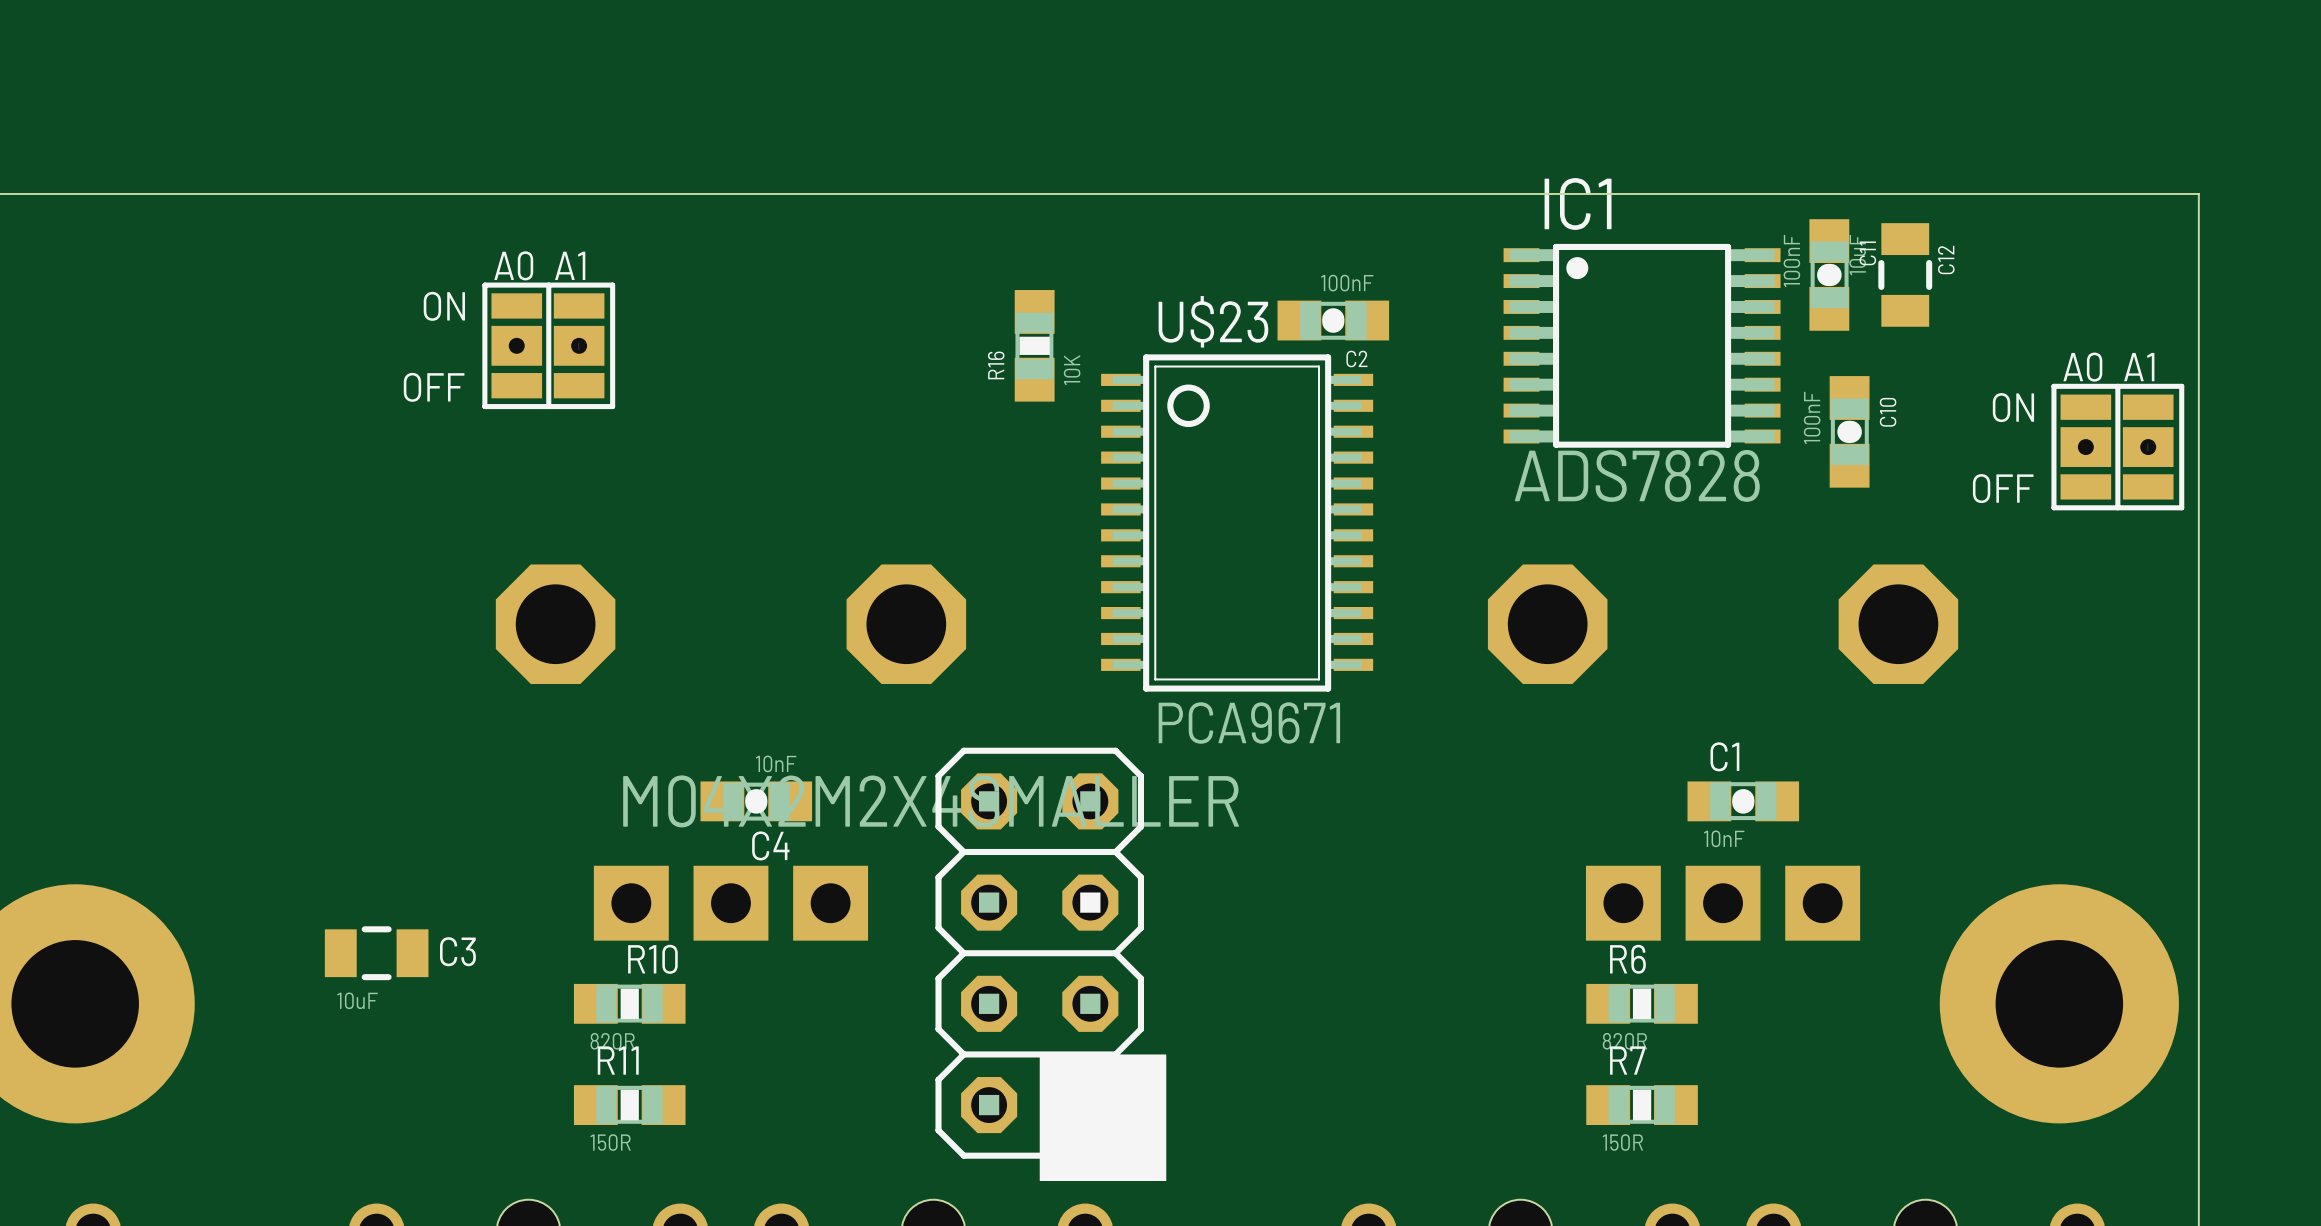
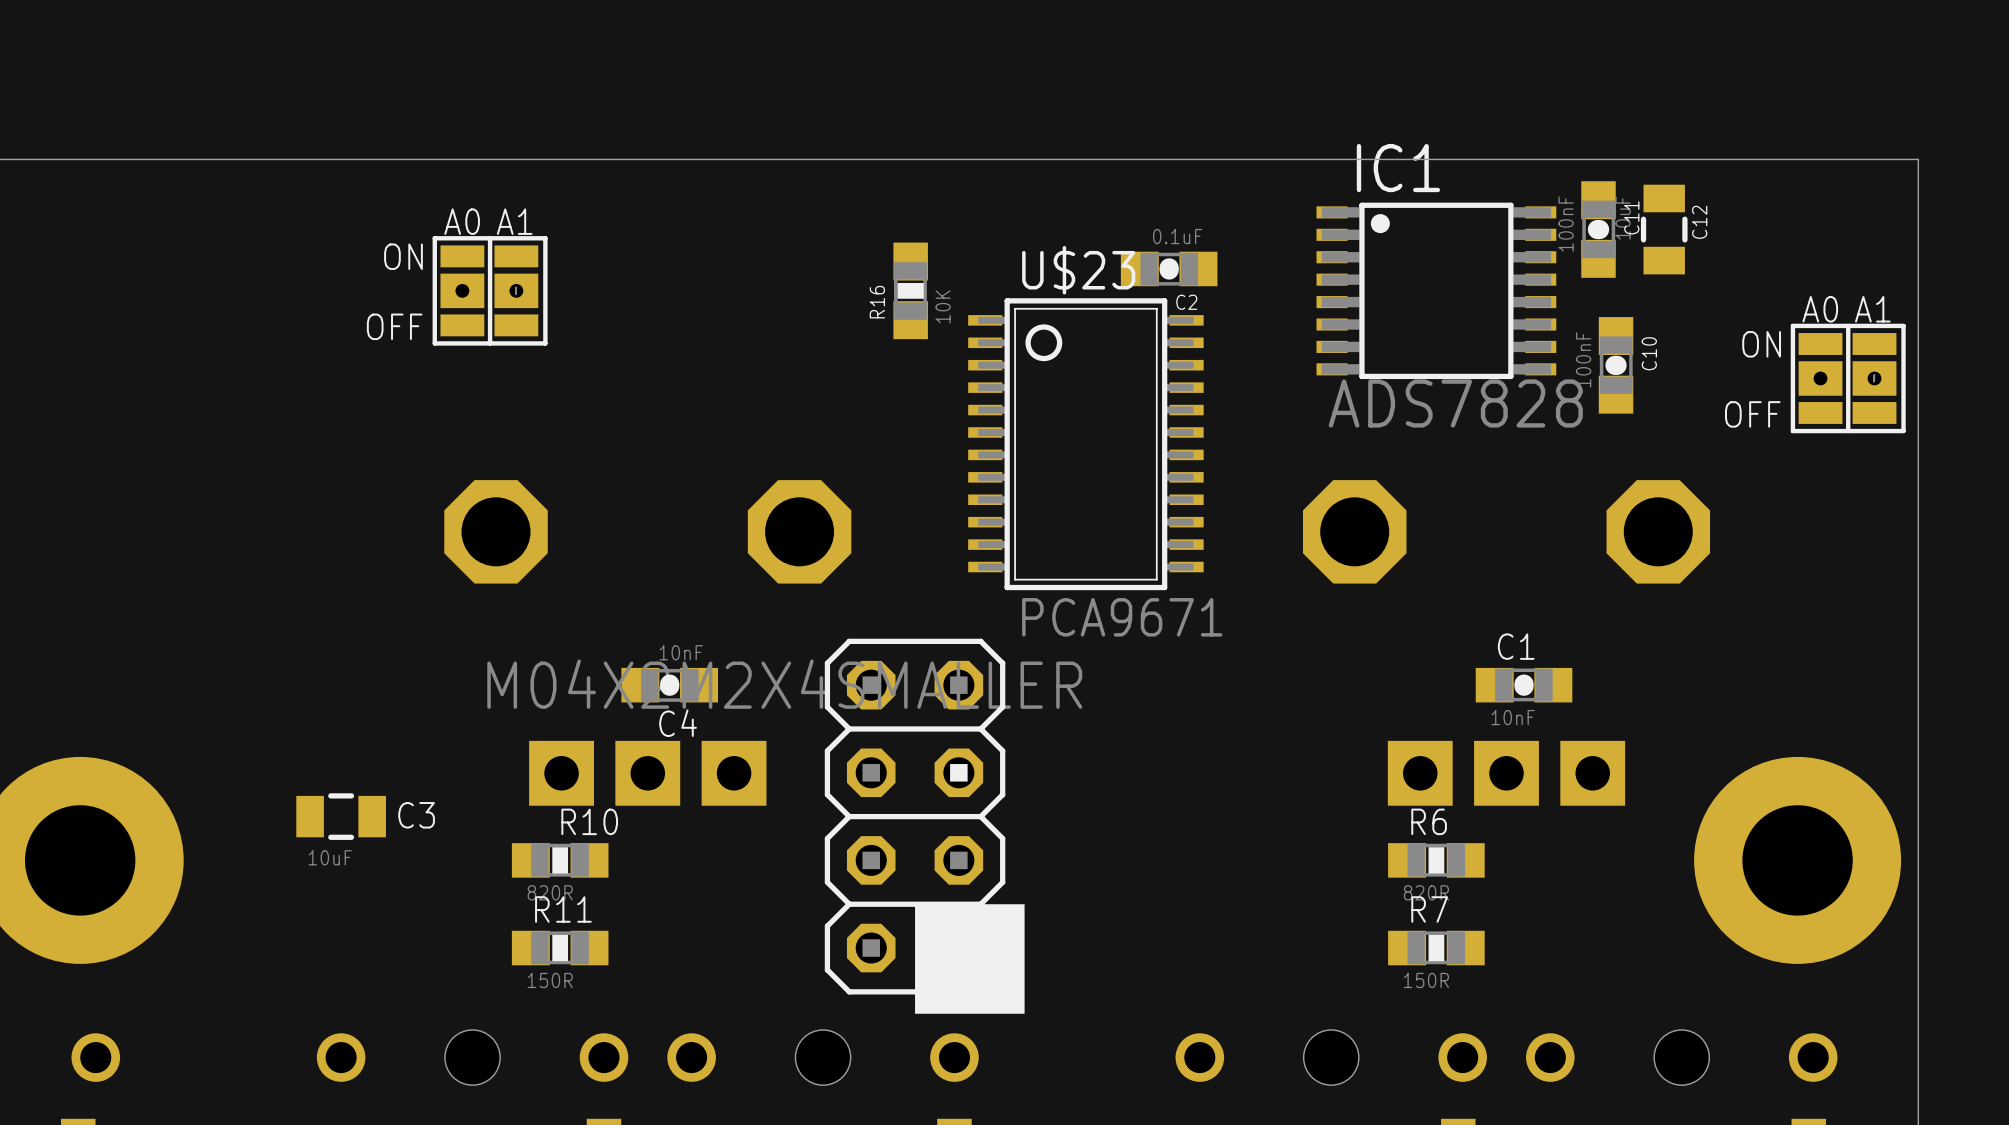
C2 value: 100nF (1347, 283) -> 0.1uF (1177, 236)

